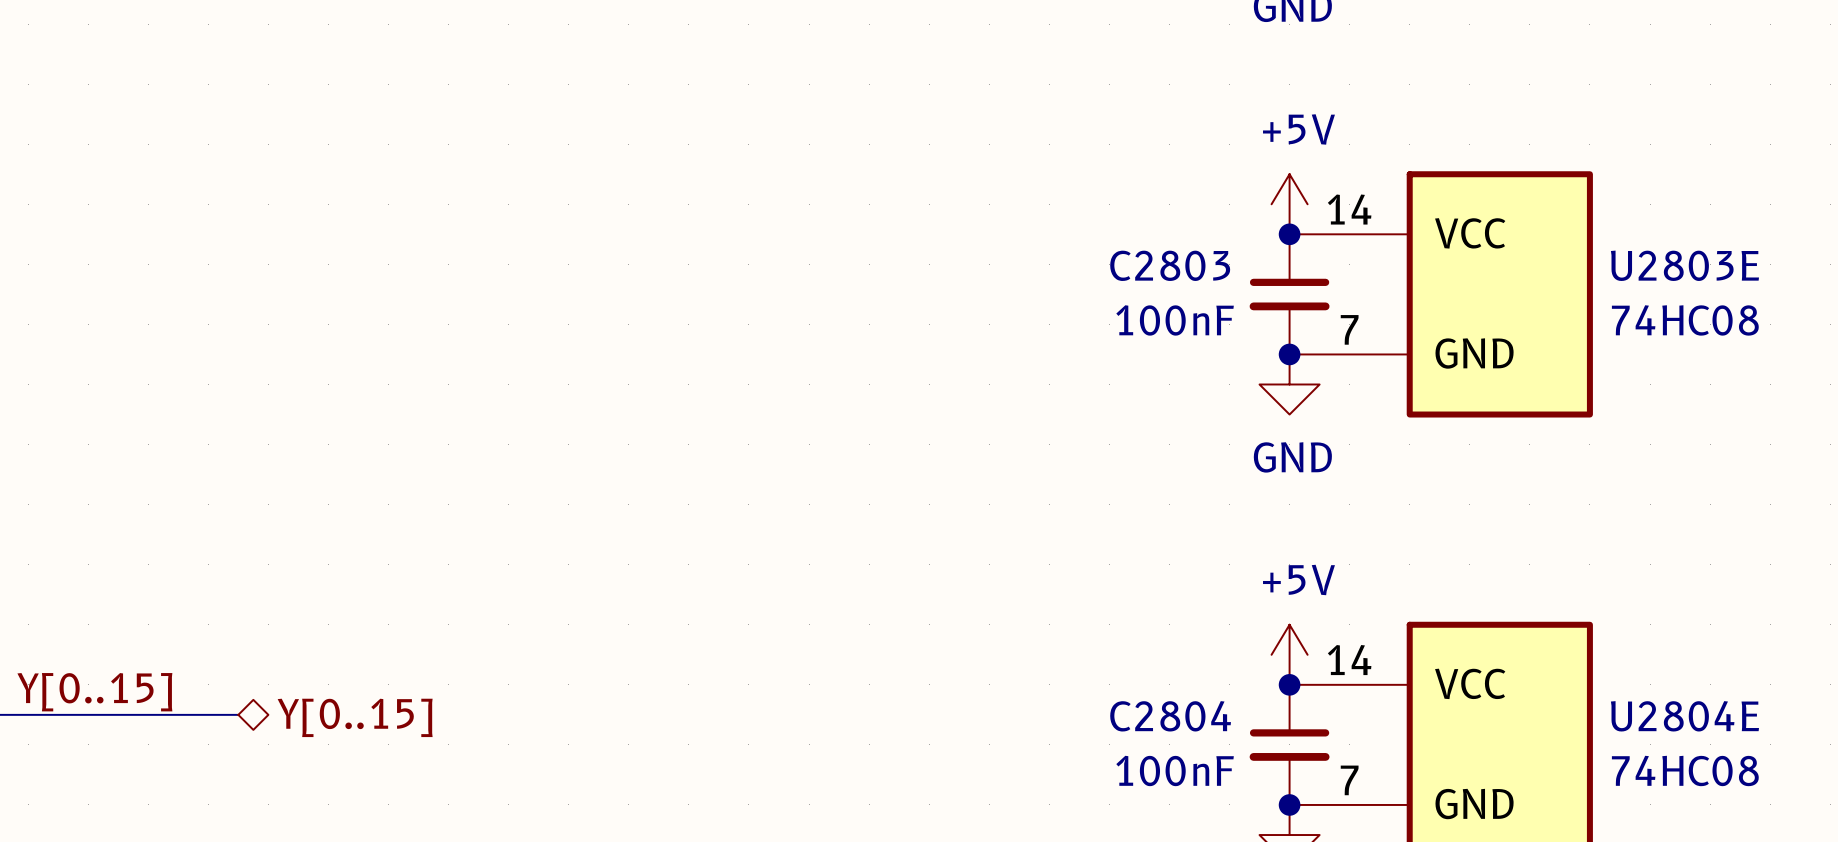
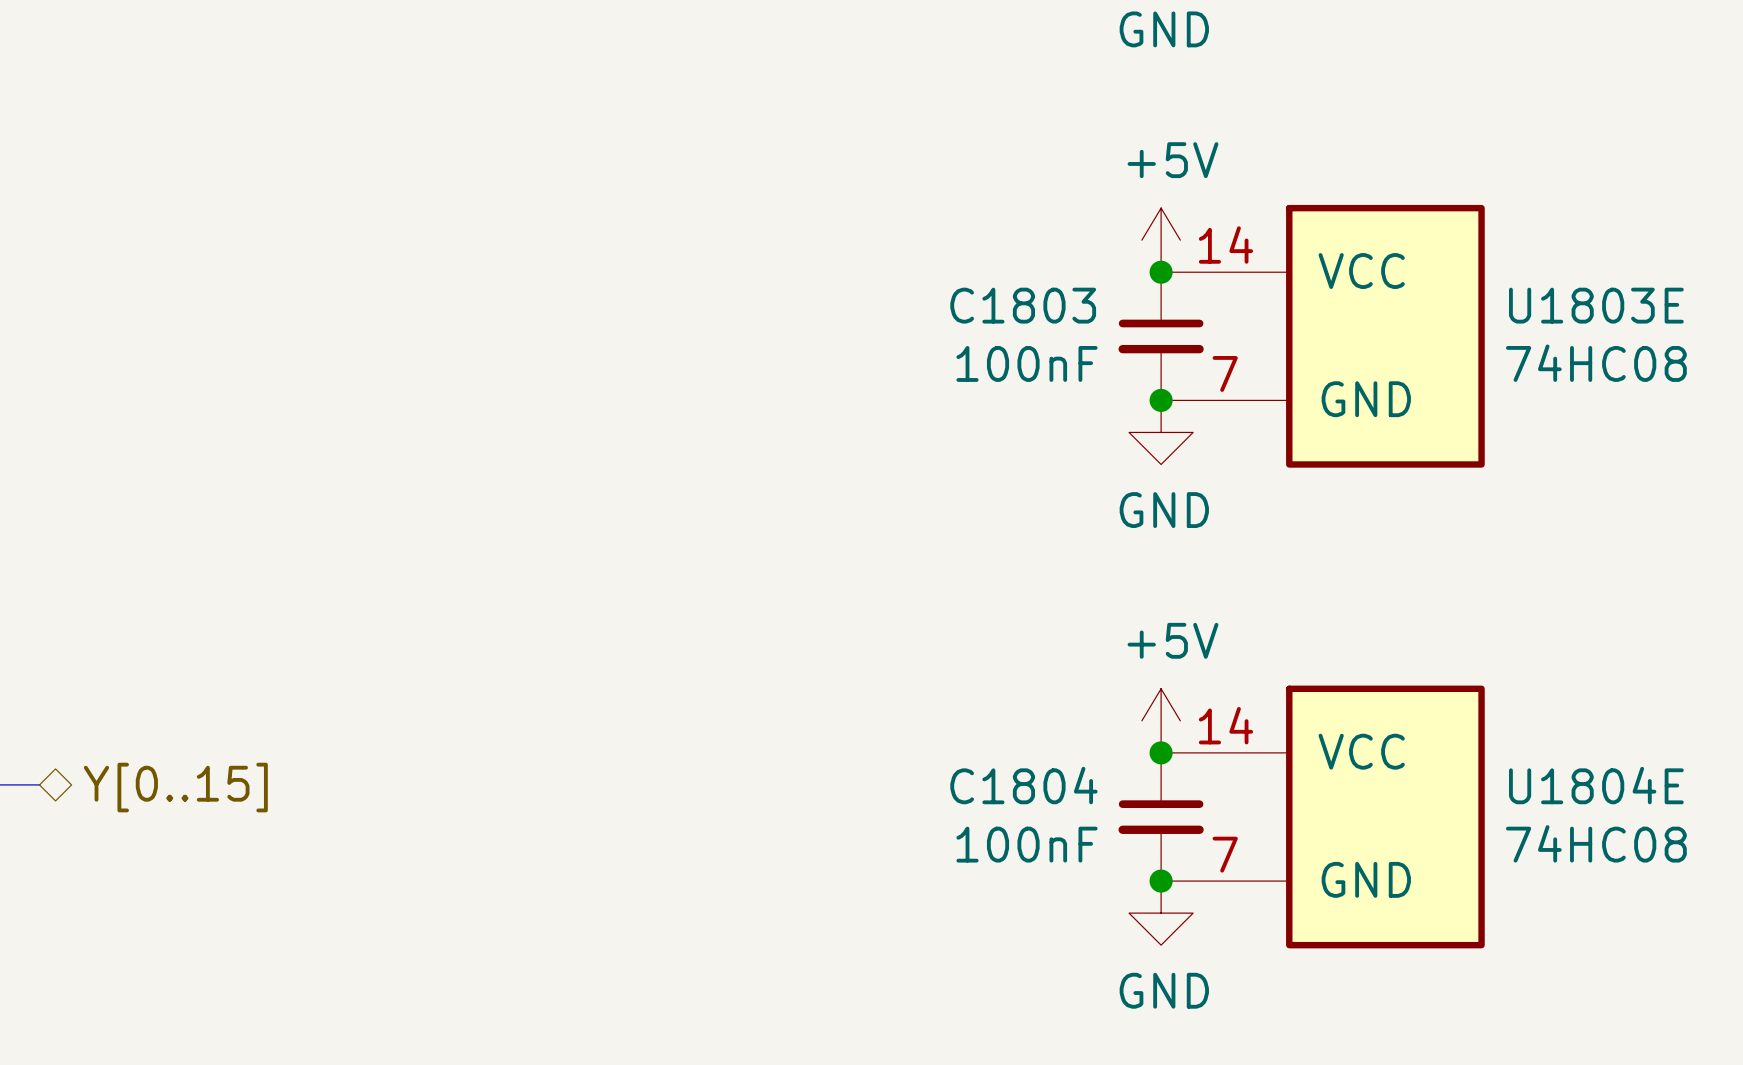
C2803 name: C2803 (1170, 265) -> C1803 (1023, 305)
U2803E name: U2803E (1684, 265) -> U1803E (1596, 305)
C2804 name: C2804 (1170, 716) -> C1804 (1023, 785)
U2804E name: U2804E (1684, 716) -> U1804E (1596, 785)

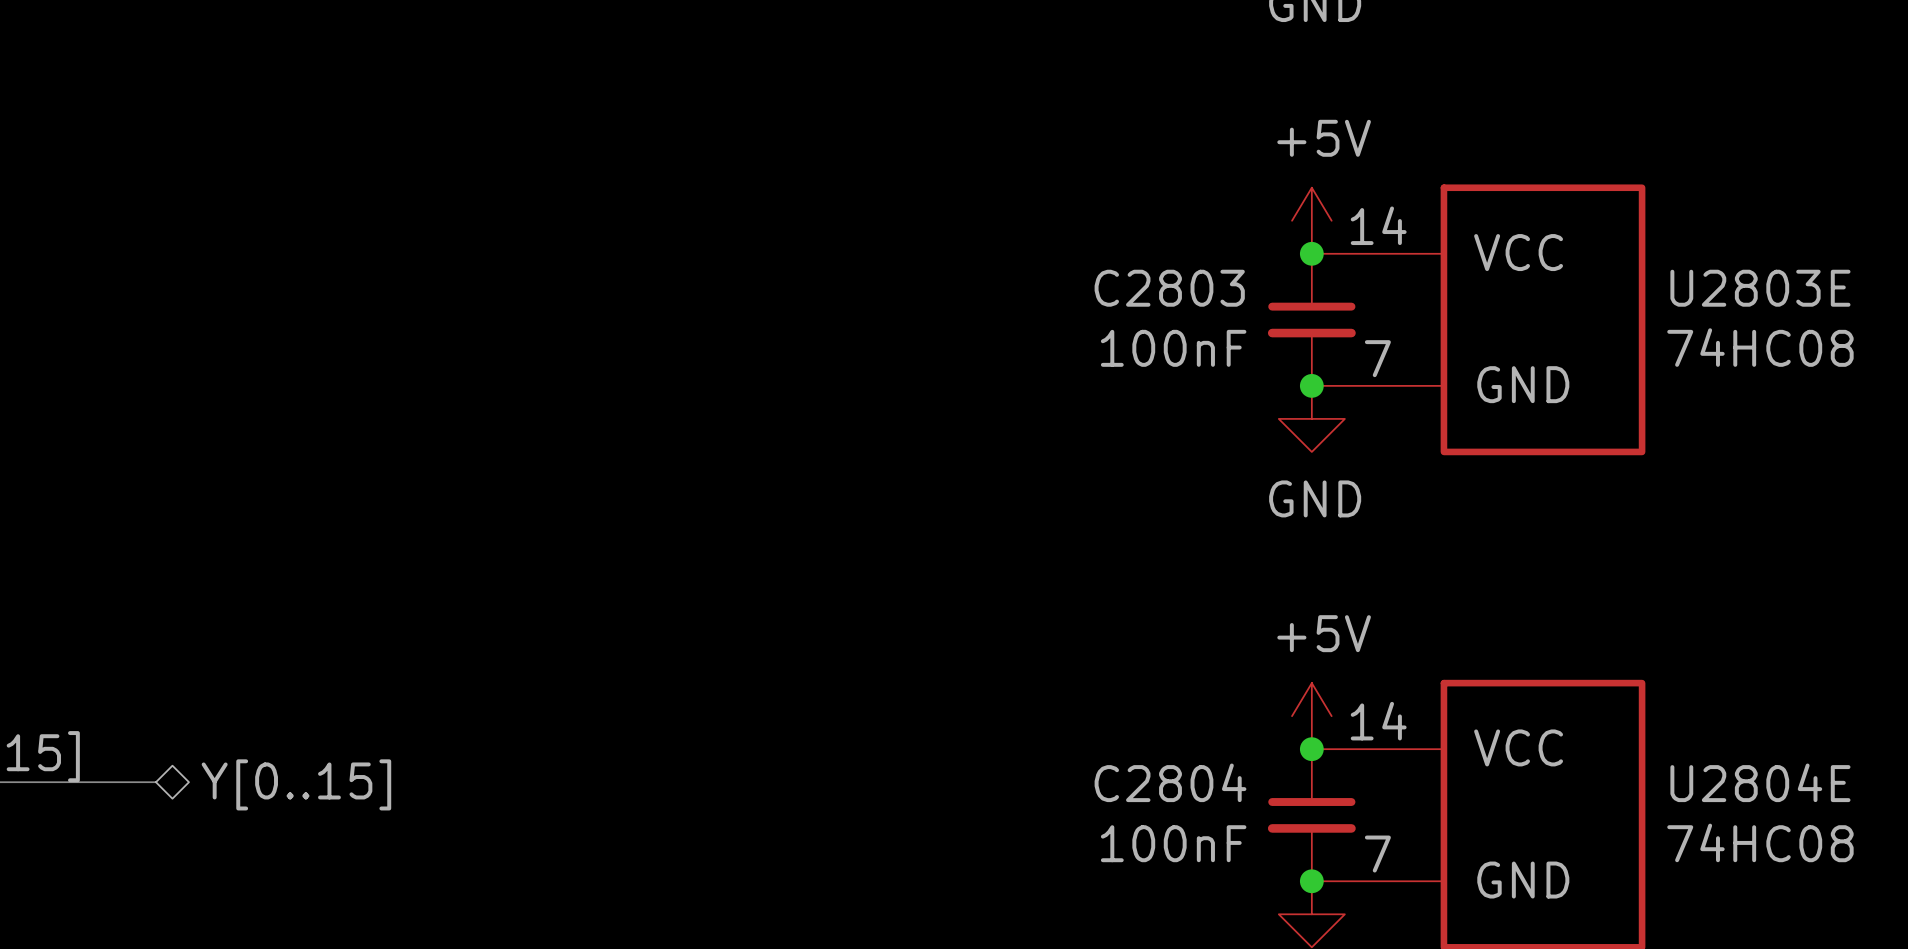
C1803 name: C1803 (1023, 305) -> C2803 (1169, 288)
U1803E name: U1803E (1596, 305) -> U2803E (1760, 288)
C1804 name: C1804 (1023, 785) -> C2804 (1170, 782)
U1804E name: U1804E (1596, 785) -> U2804E (1760, 782)

